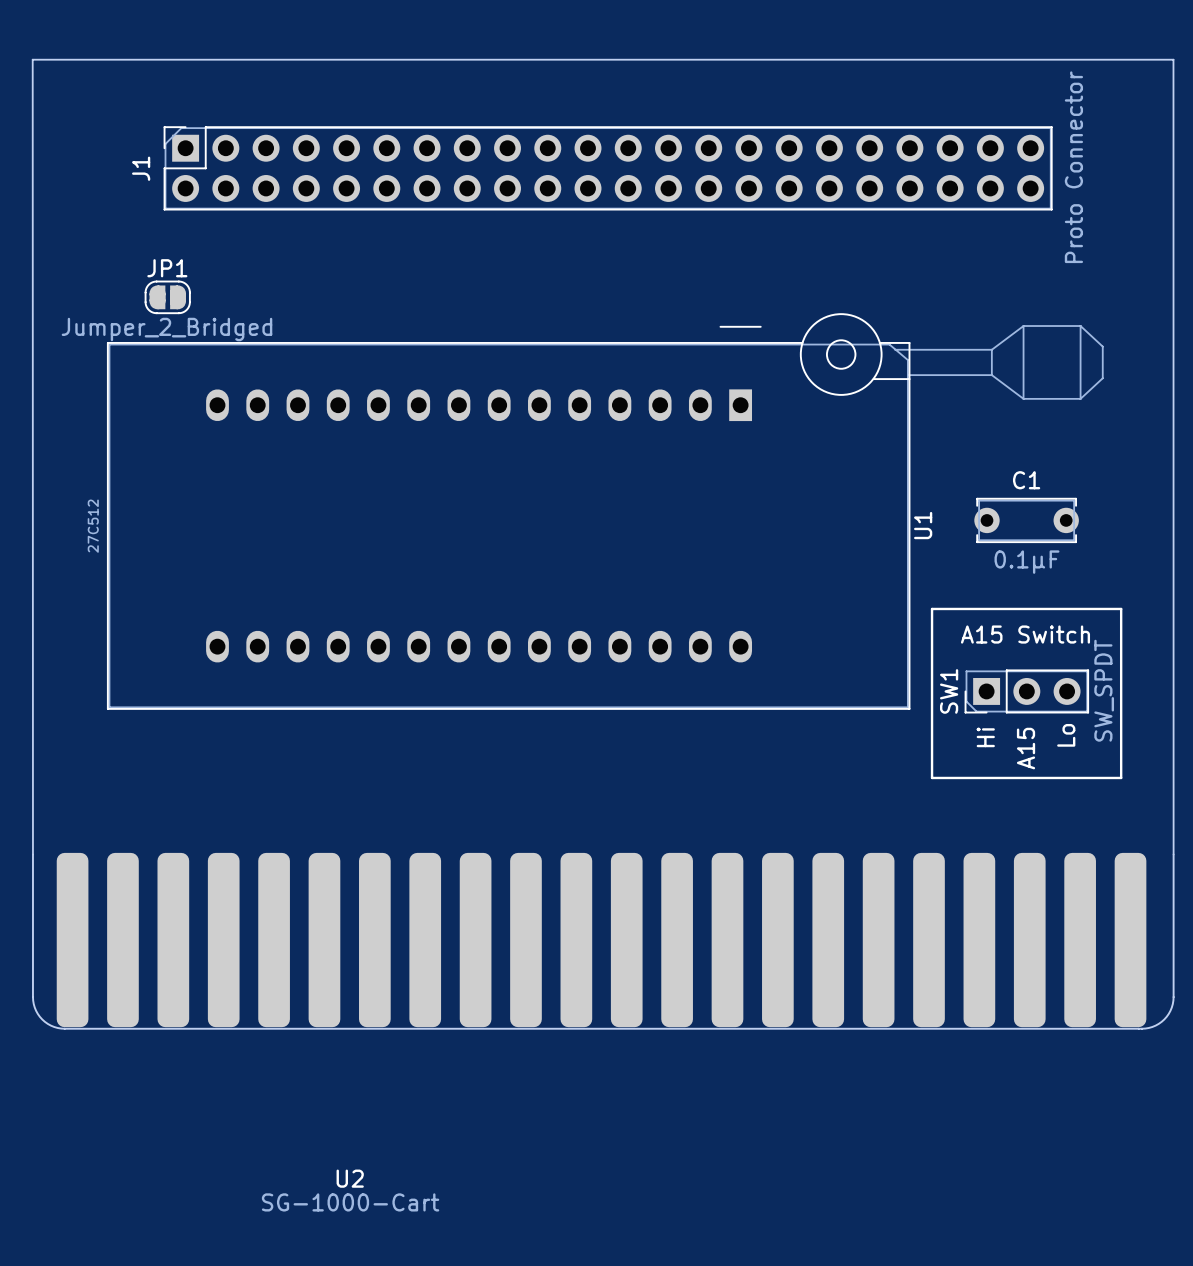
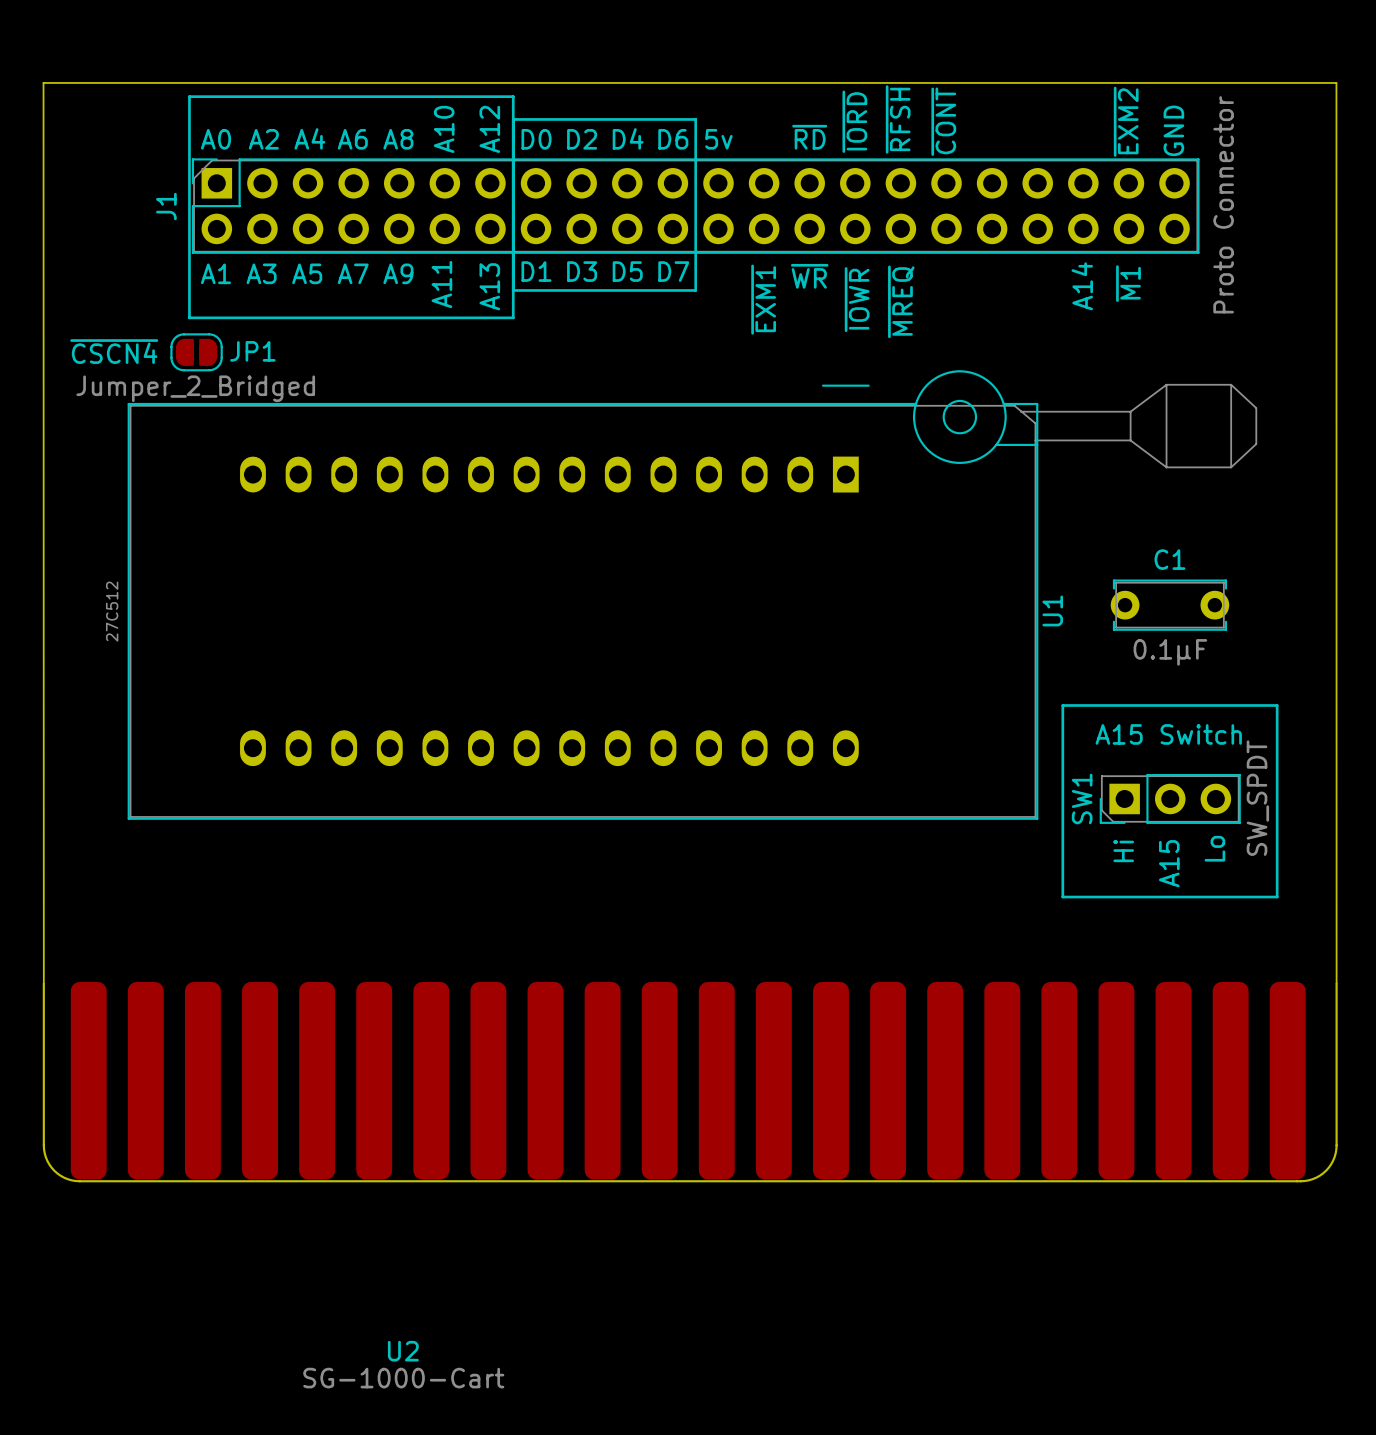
line: none -> (189, 96) (513, 96) (513, 317) (189, 317) (189, 96)
line: none -> (513, 119) (695, 119) (695, 290) (513, 290)
text: none -> ~{RFSH} (898, 119)
text: none -> ~{IORD} (854, 121)
text: none -> ~{CONT} (943, 121)
text: none -> ~{EXM2} (1126, 121)
text: none -> A10 (444, 129)
text: none -> A12 (489, 129)
text: none -> GND (1173, 130)
text: none -> ~{RD} (809, 137)
text: none -> A0 (215, 139)
text: none -> A2 (263, 139)
text: none -> A4 (309, 138)
text: none -> A6 (352, 139)
text: none -> A8 (398, 139)
text: none -> D0 (536, 139)
text: none -> D2 (582, 139)
text: none -> D4 (628, 138)
text: none -> D6 (673, 139)
text: none -> 5v (718, 139)
text: none -> D1 (536, 271)
text: none -> D3 (582, 271)
text: none -> D5 (627, 271)
text: none -> D7 (673, 271)
text: none -> A1 (215, 273)
text: none -> A3 (261, 273)
text: none -> A5 (307, 273)
text: none -> A7 (353, 273)
text: none -> A9 (398, 273)
text: none -> ~{WR} (809, 276)
text: none -> ~{M1} (1128, 283)
text: none -> A11 (441, 284)
text: none -> A13 (489, 286)
text: none -> A14 (1082, 286)
text: none -> ~{EXM1} (763, 299)
text: none -> ~{IOWR} (857, 299)
text: none -> ~{MREQ} (901, 301)
JP1 name position: JP1 (167, 268) -> JP1 (252, 351)
text: none -> ~{CSCN4} (114, 351)

